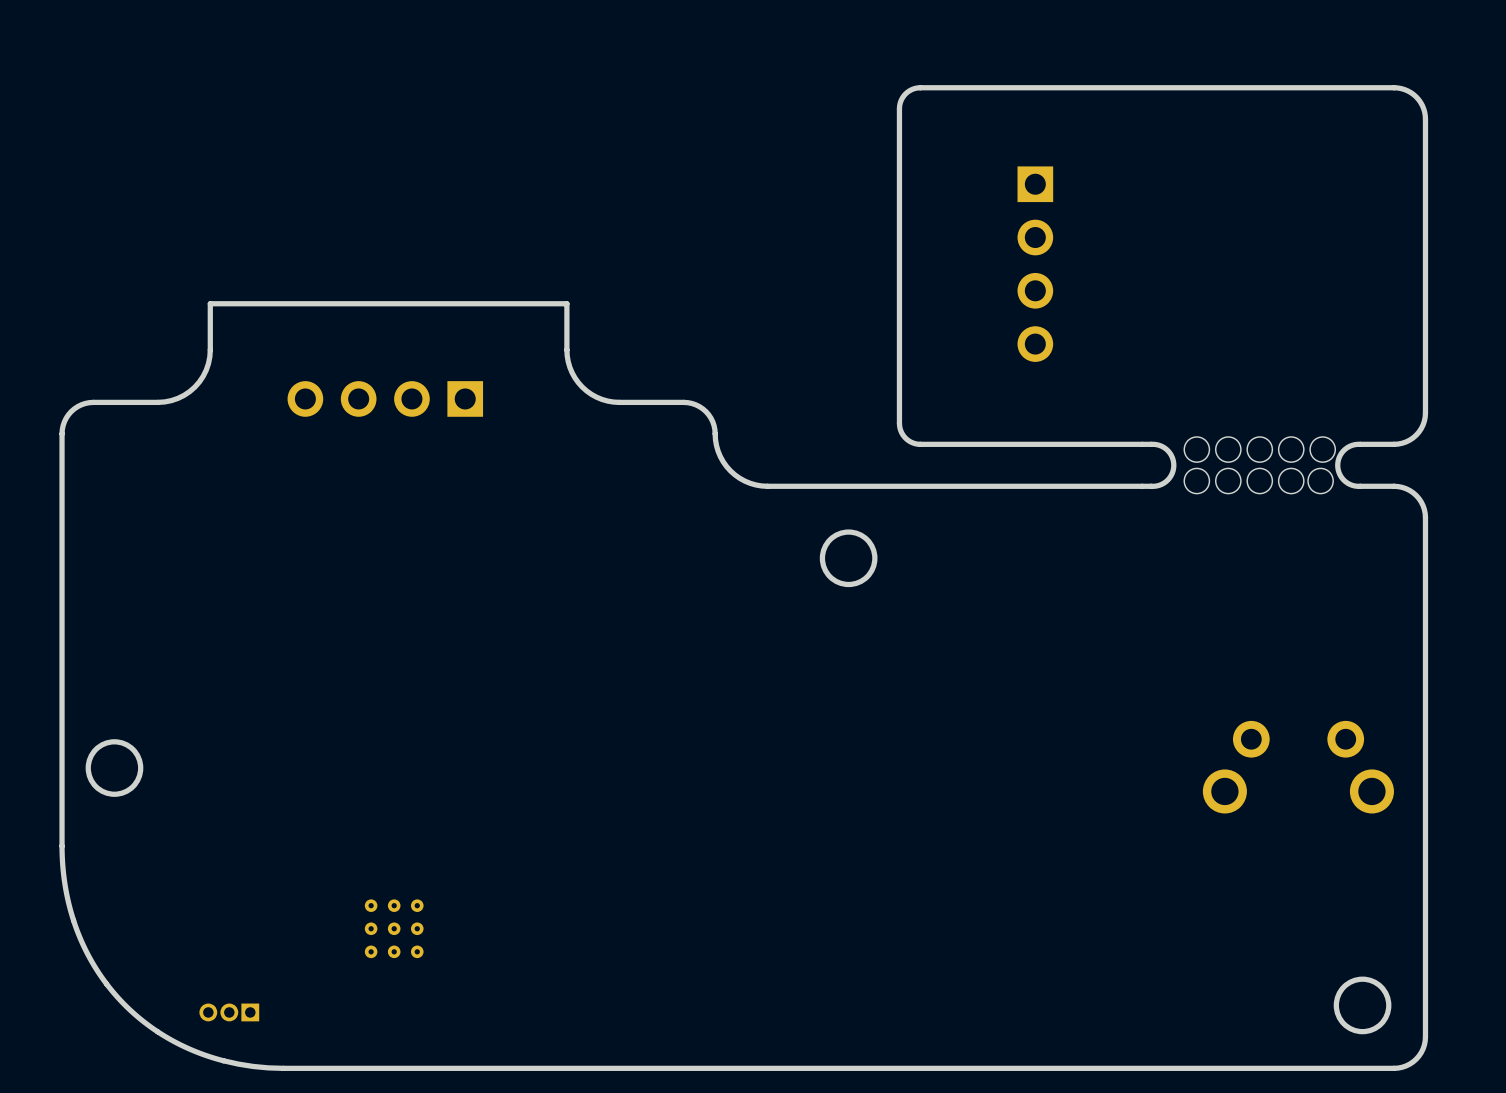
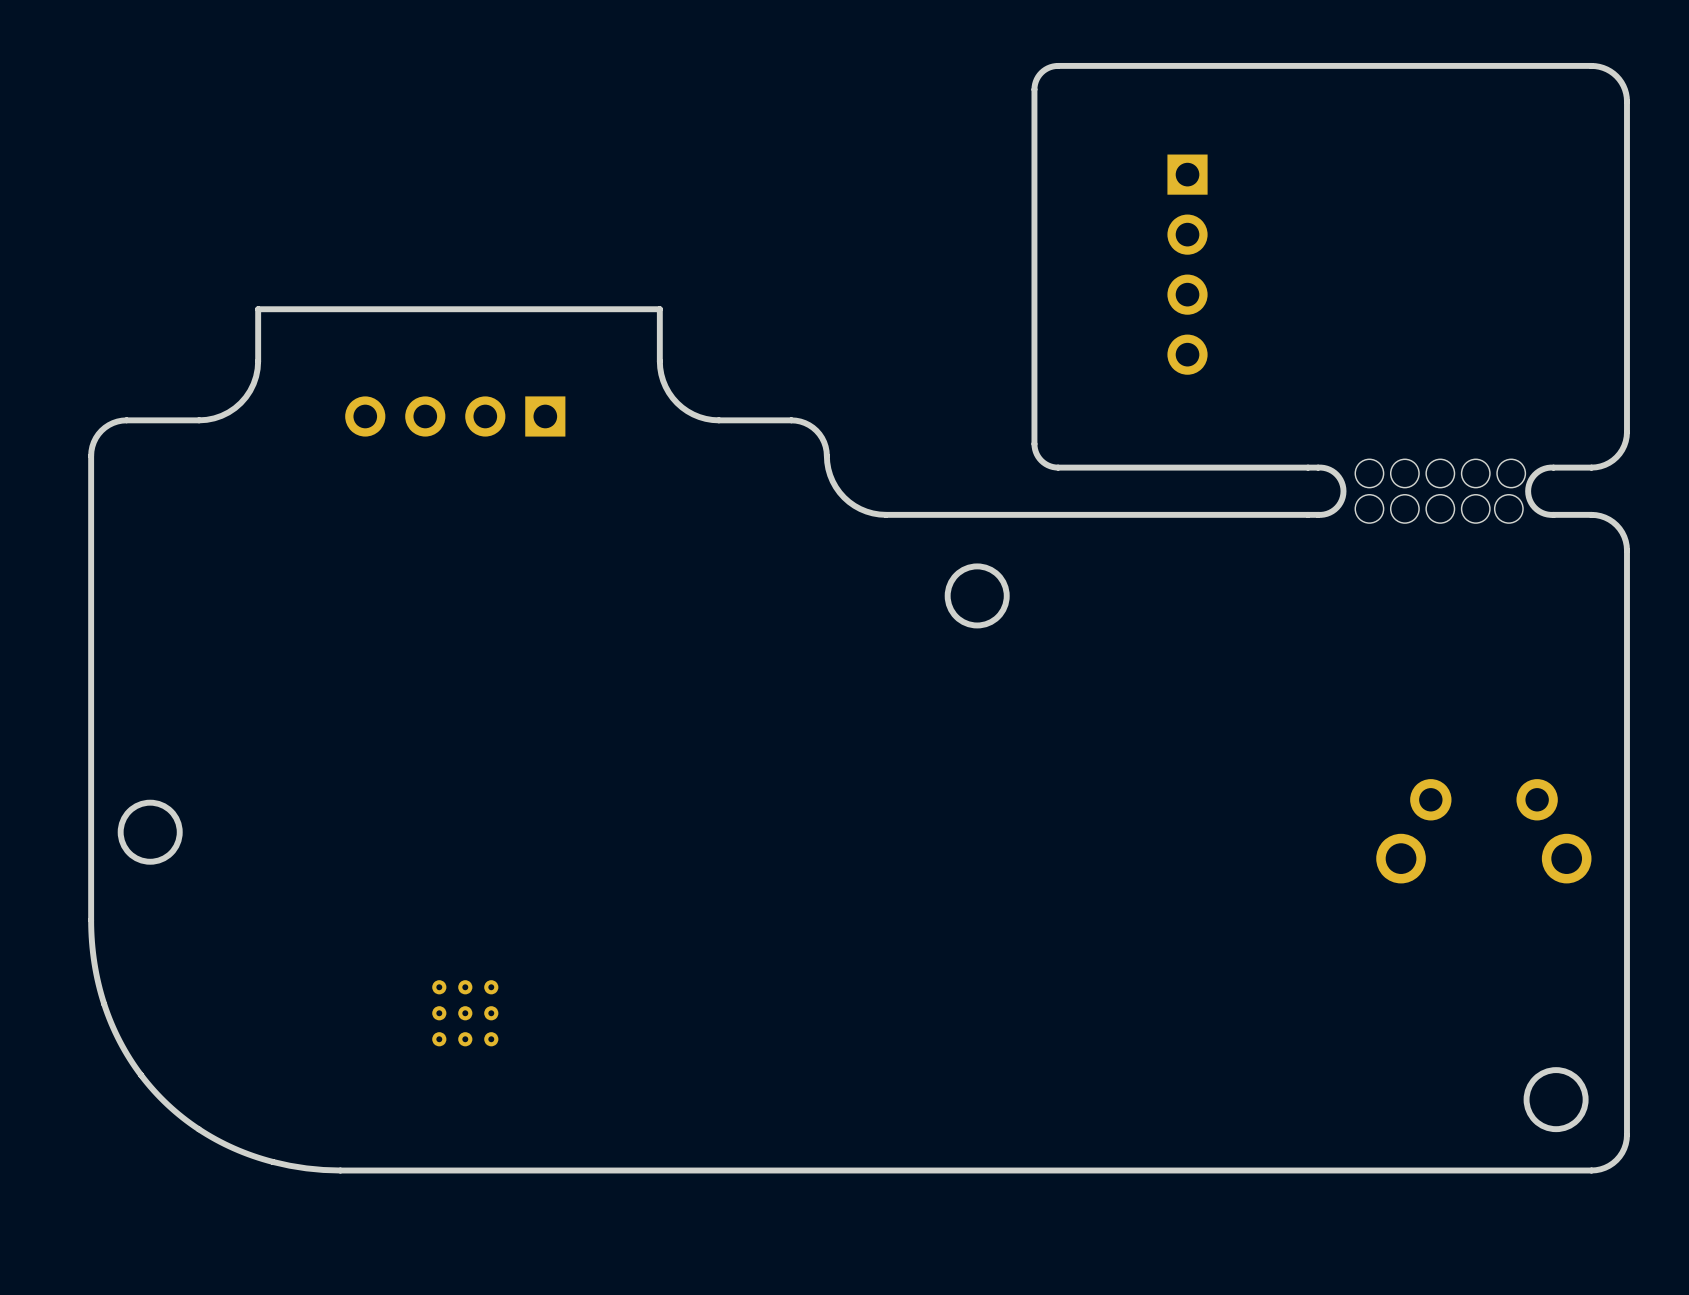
part: (229, 1012) -> none

